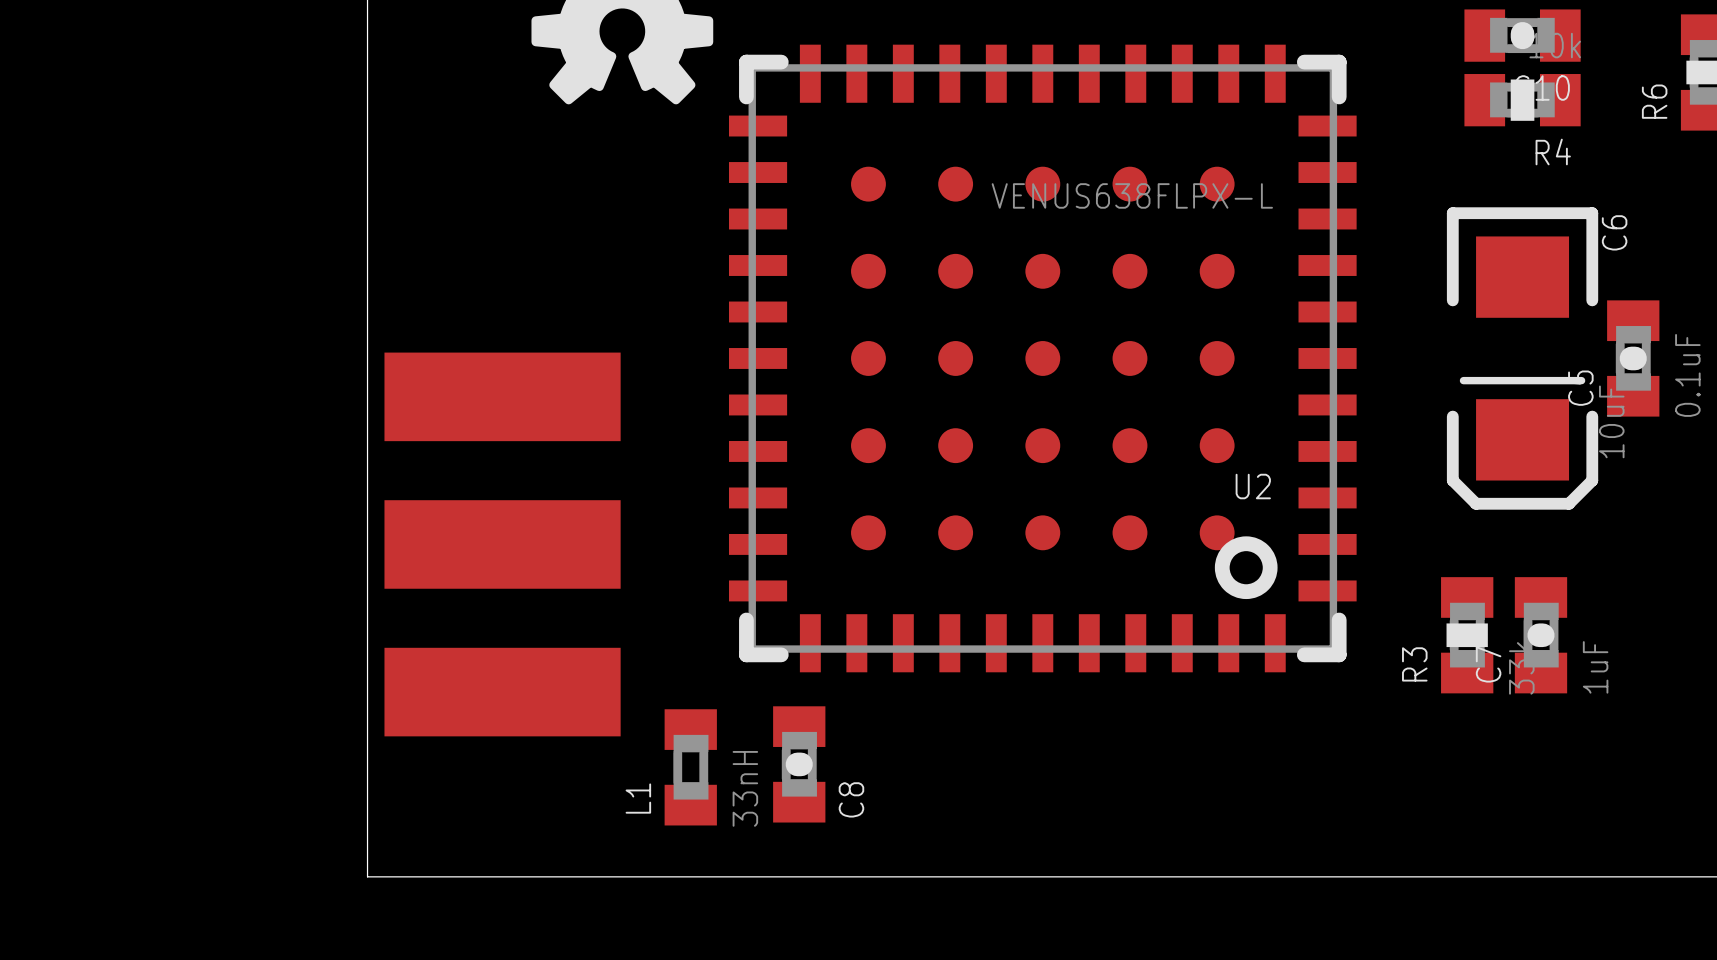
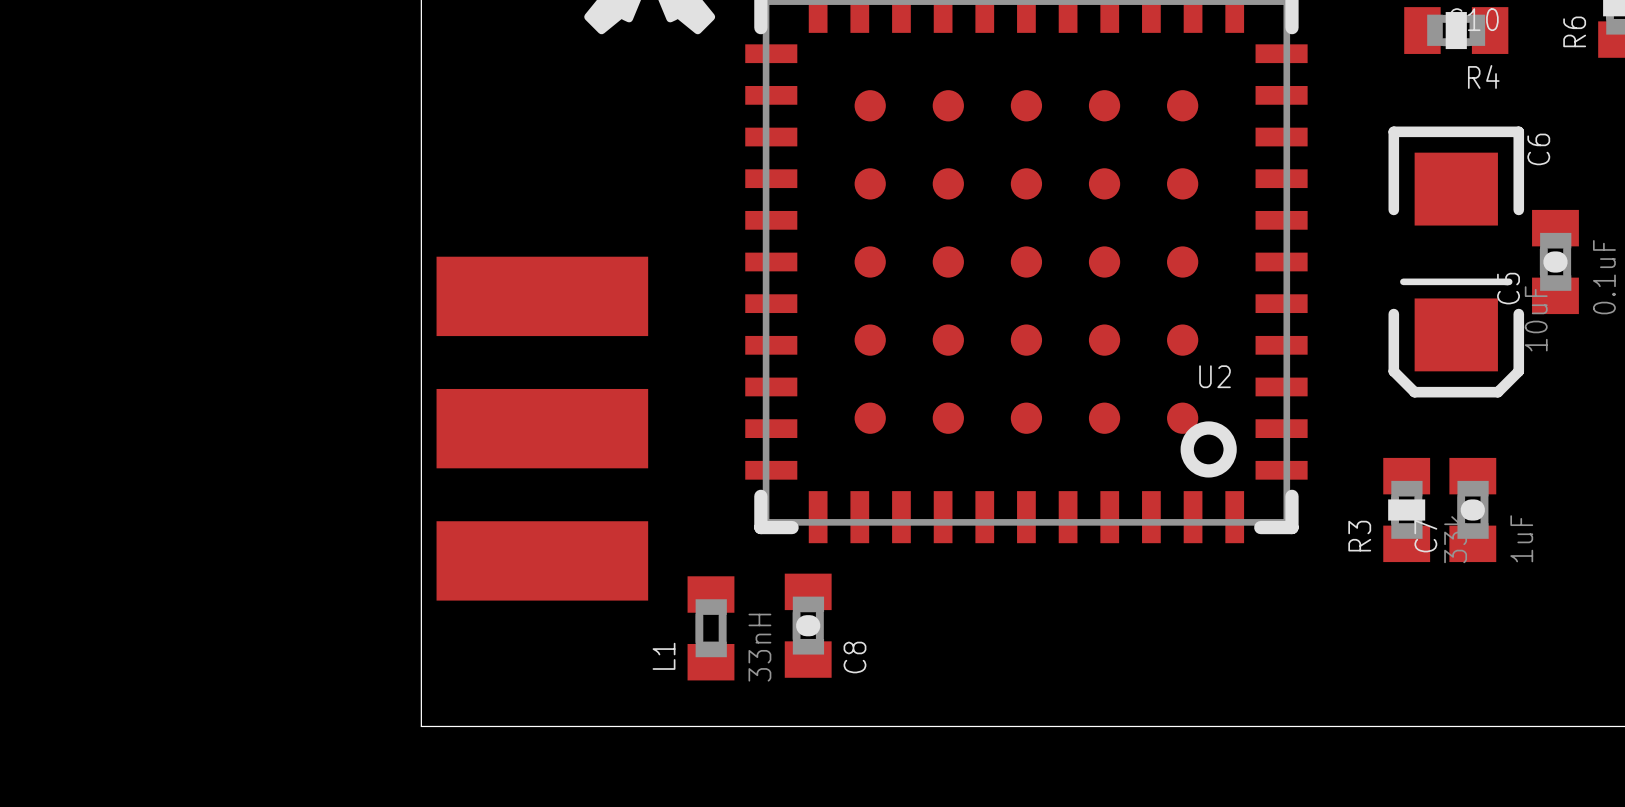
U2 value: VENUS638FLPX-L (1132, 195) -> none

